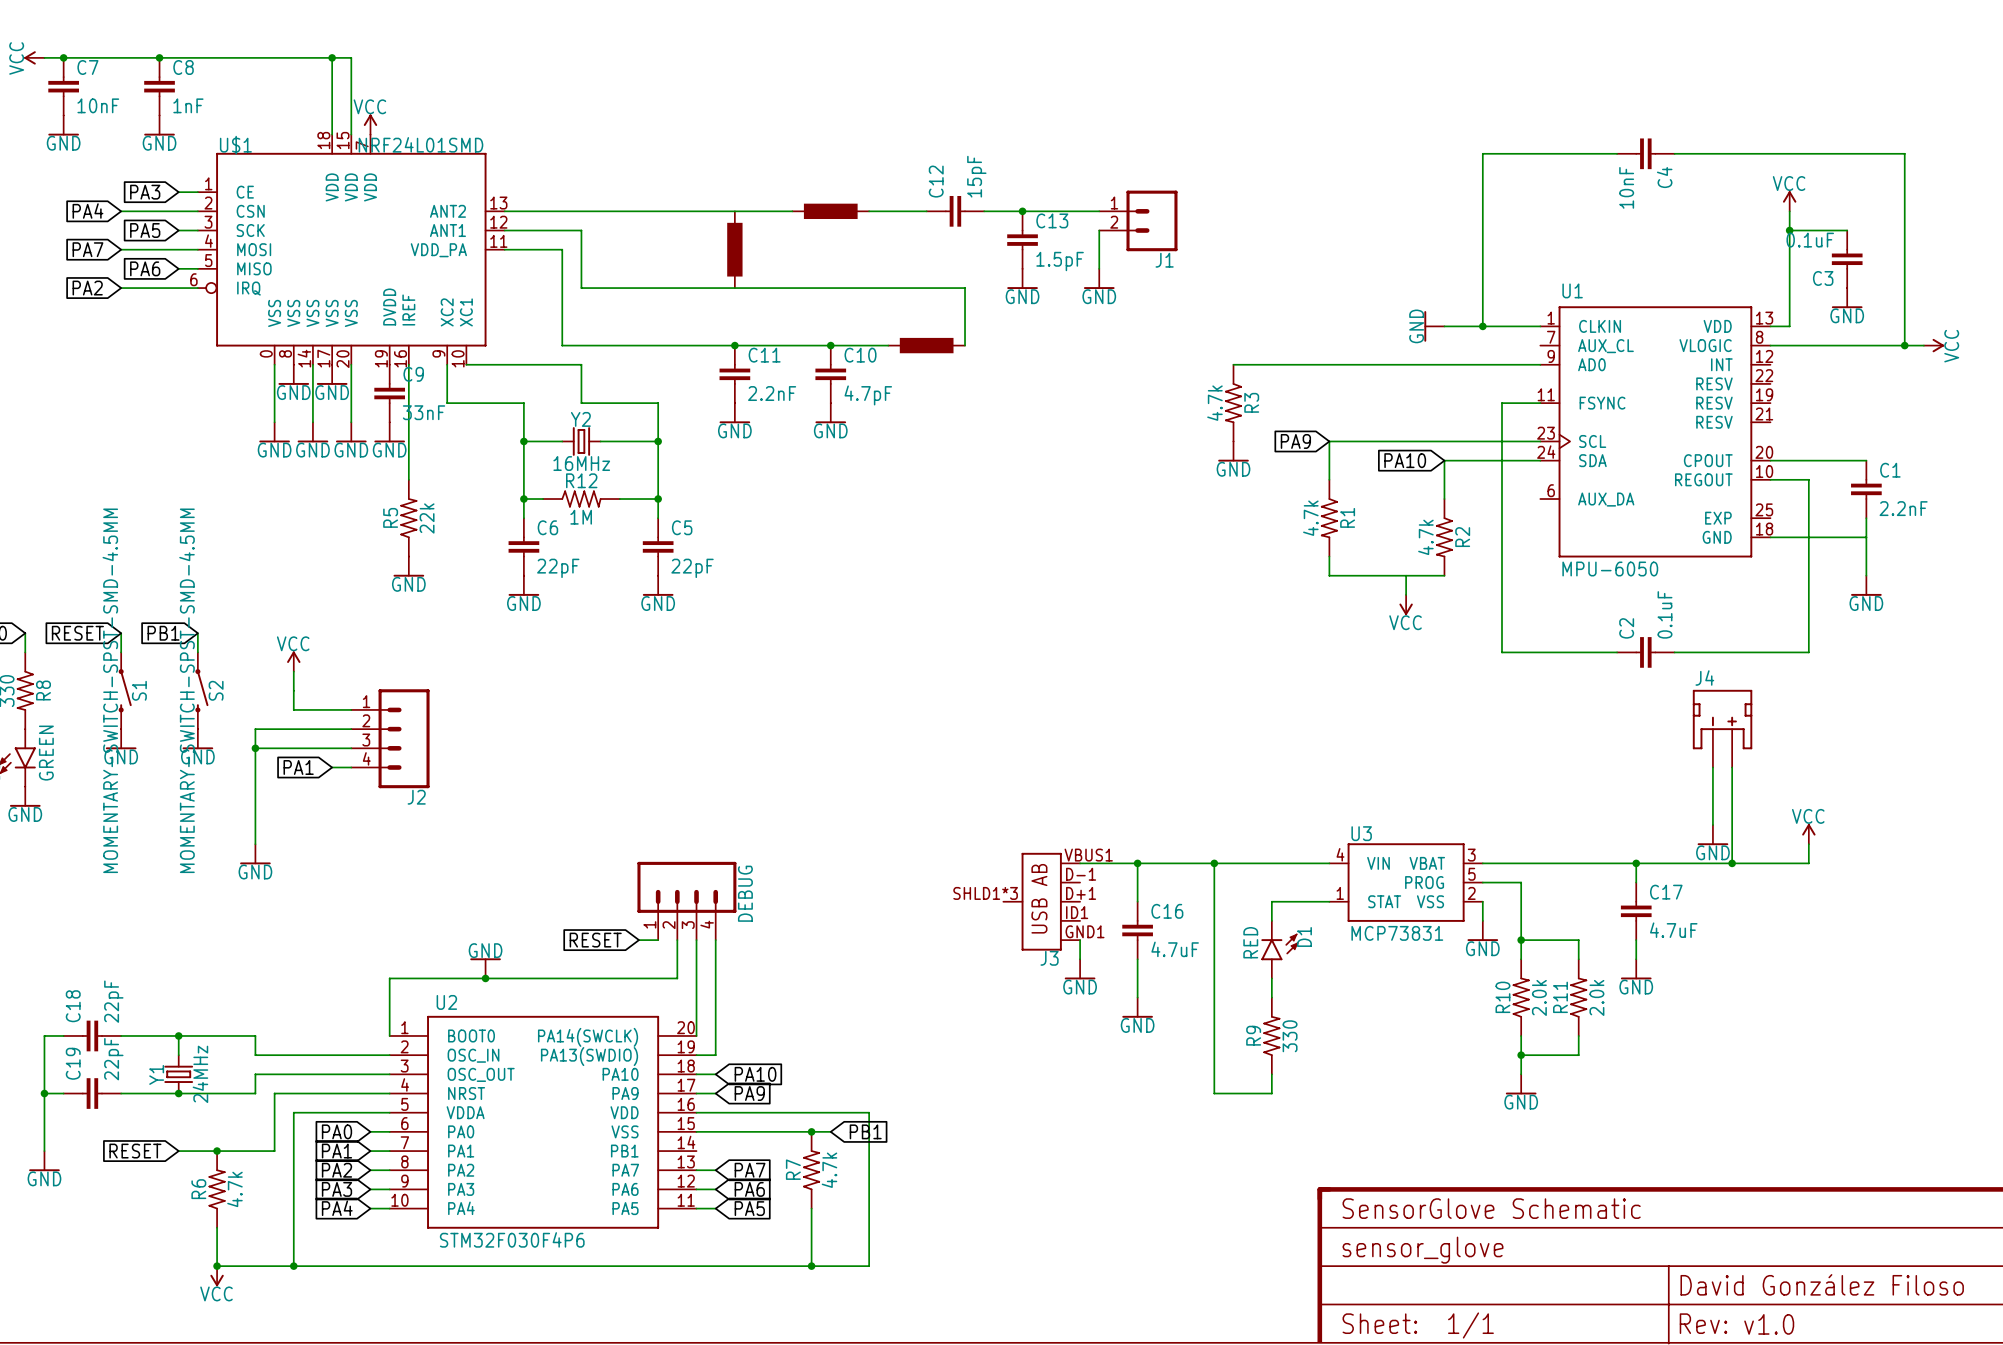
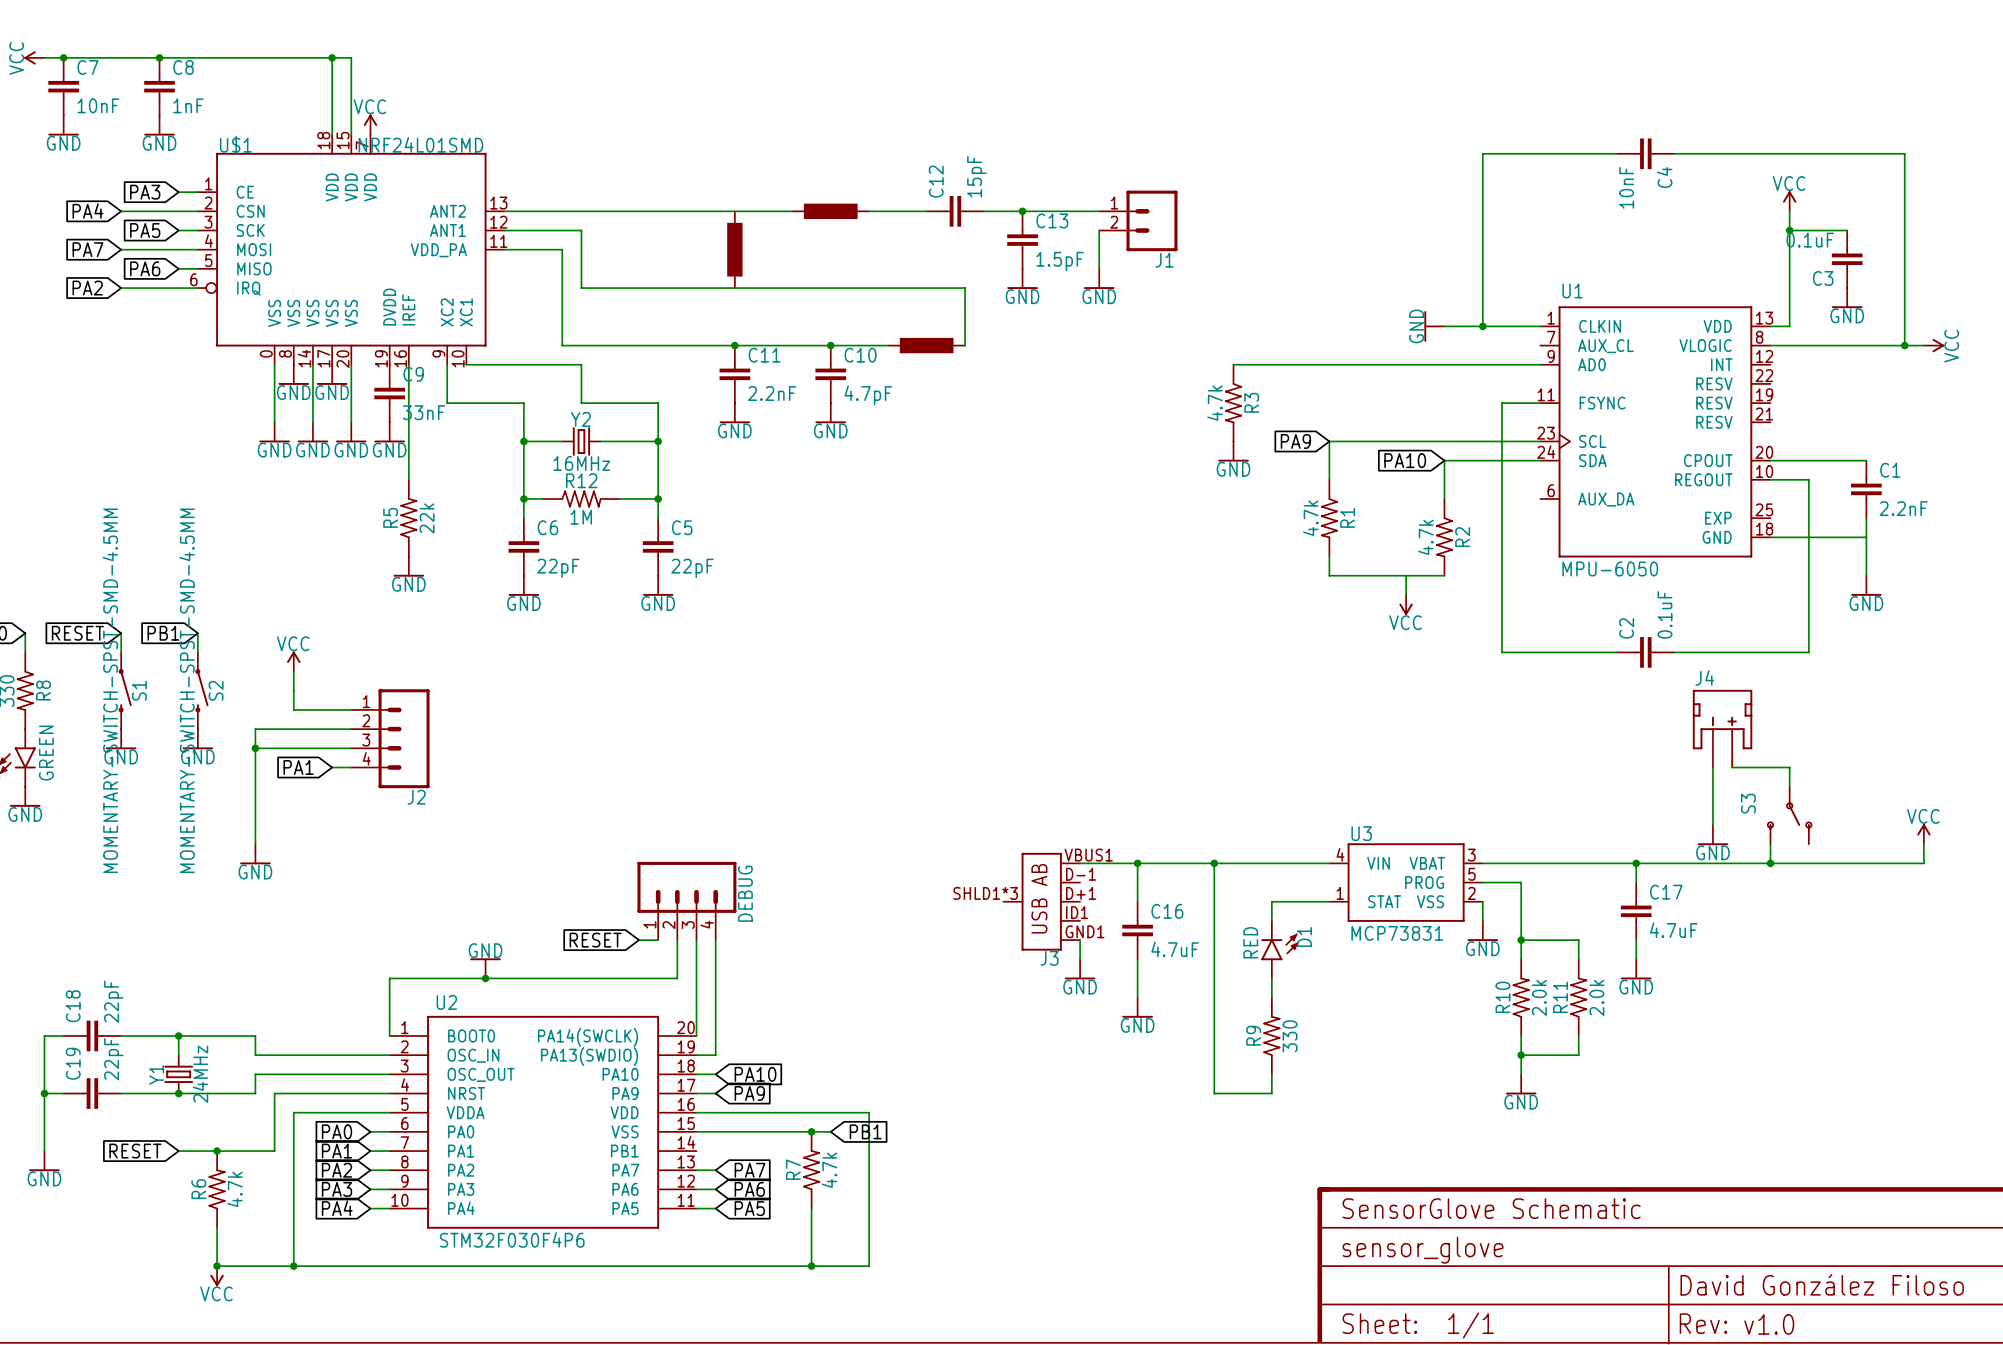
wire: (1732, 767) (1732, 863) -> (1732, 767) (1789, 767) (1789, 786)
S3: none -> (1789, 815)
power symbol position: VCC (1808, 834) -> VCC (1923, 834)
wire: none -> (1770, 844) (1770, 863)
wire: (1808, 844) (1808, 863) -> (1923, 844) (1923, 863) (1808, 863)
junction position: (1732, 863) -> (1770, 863)

